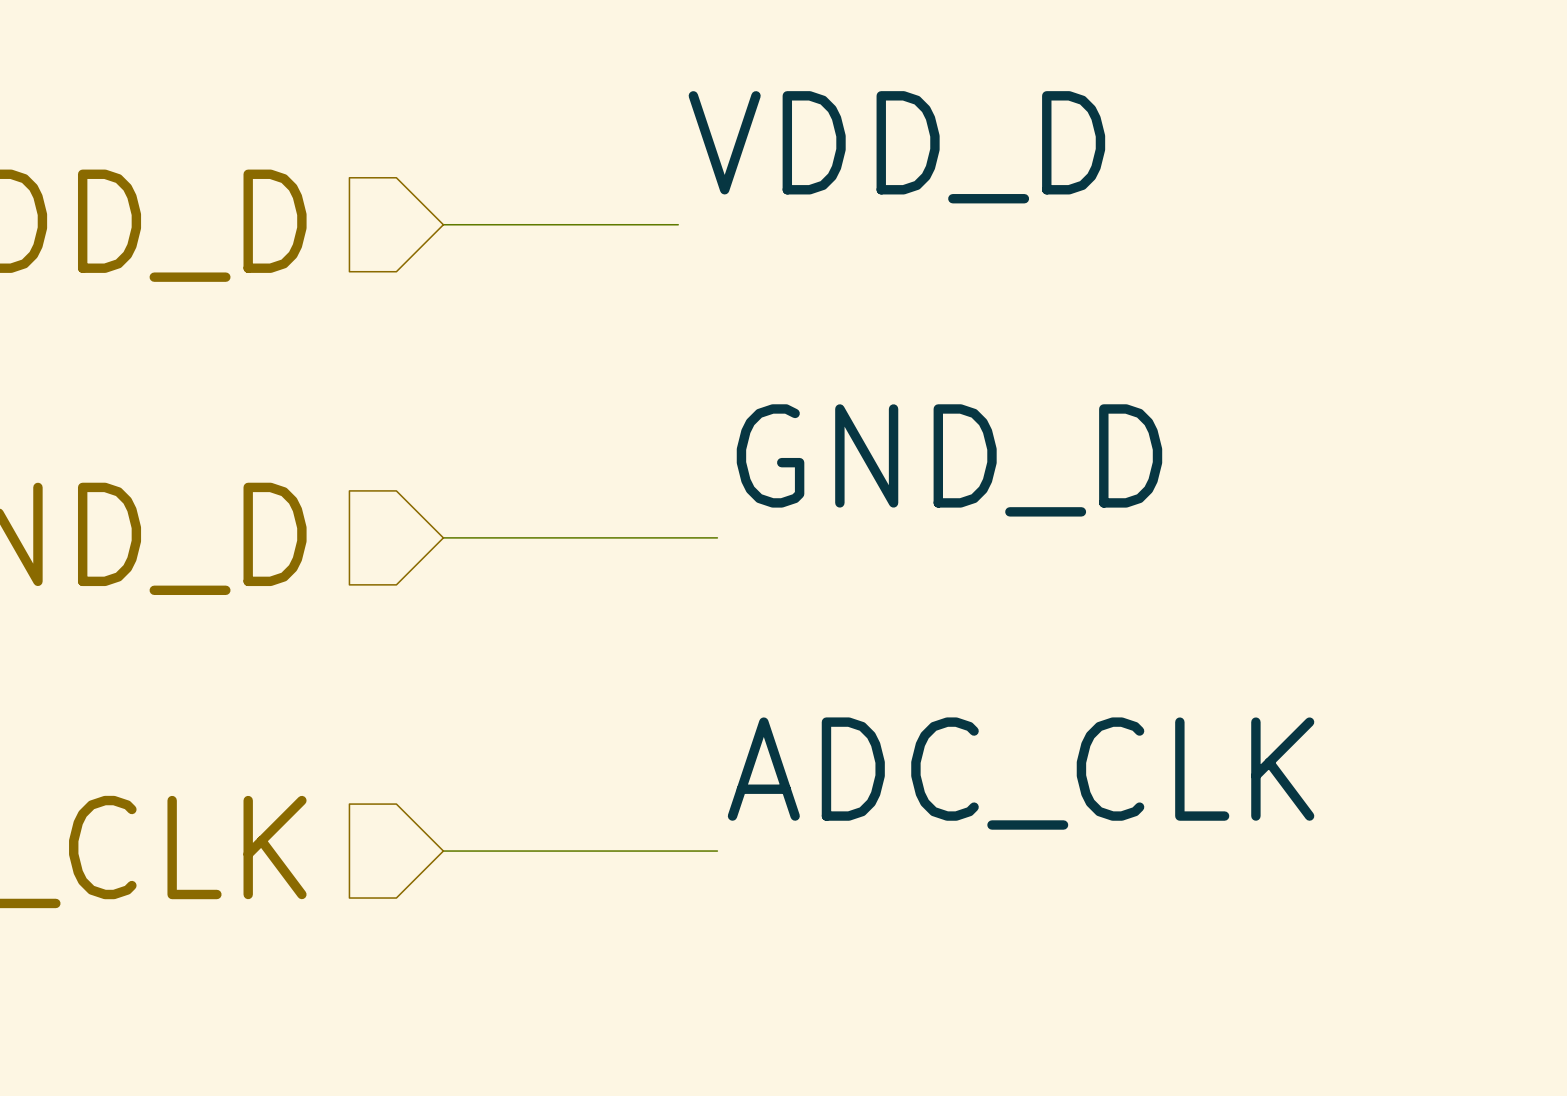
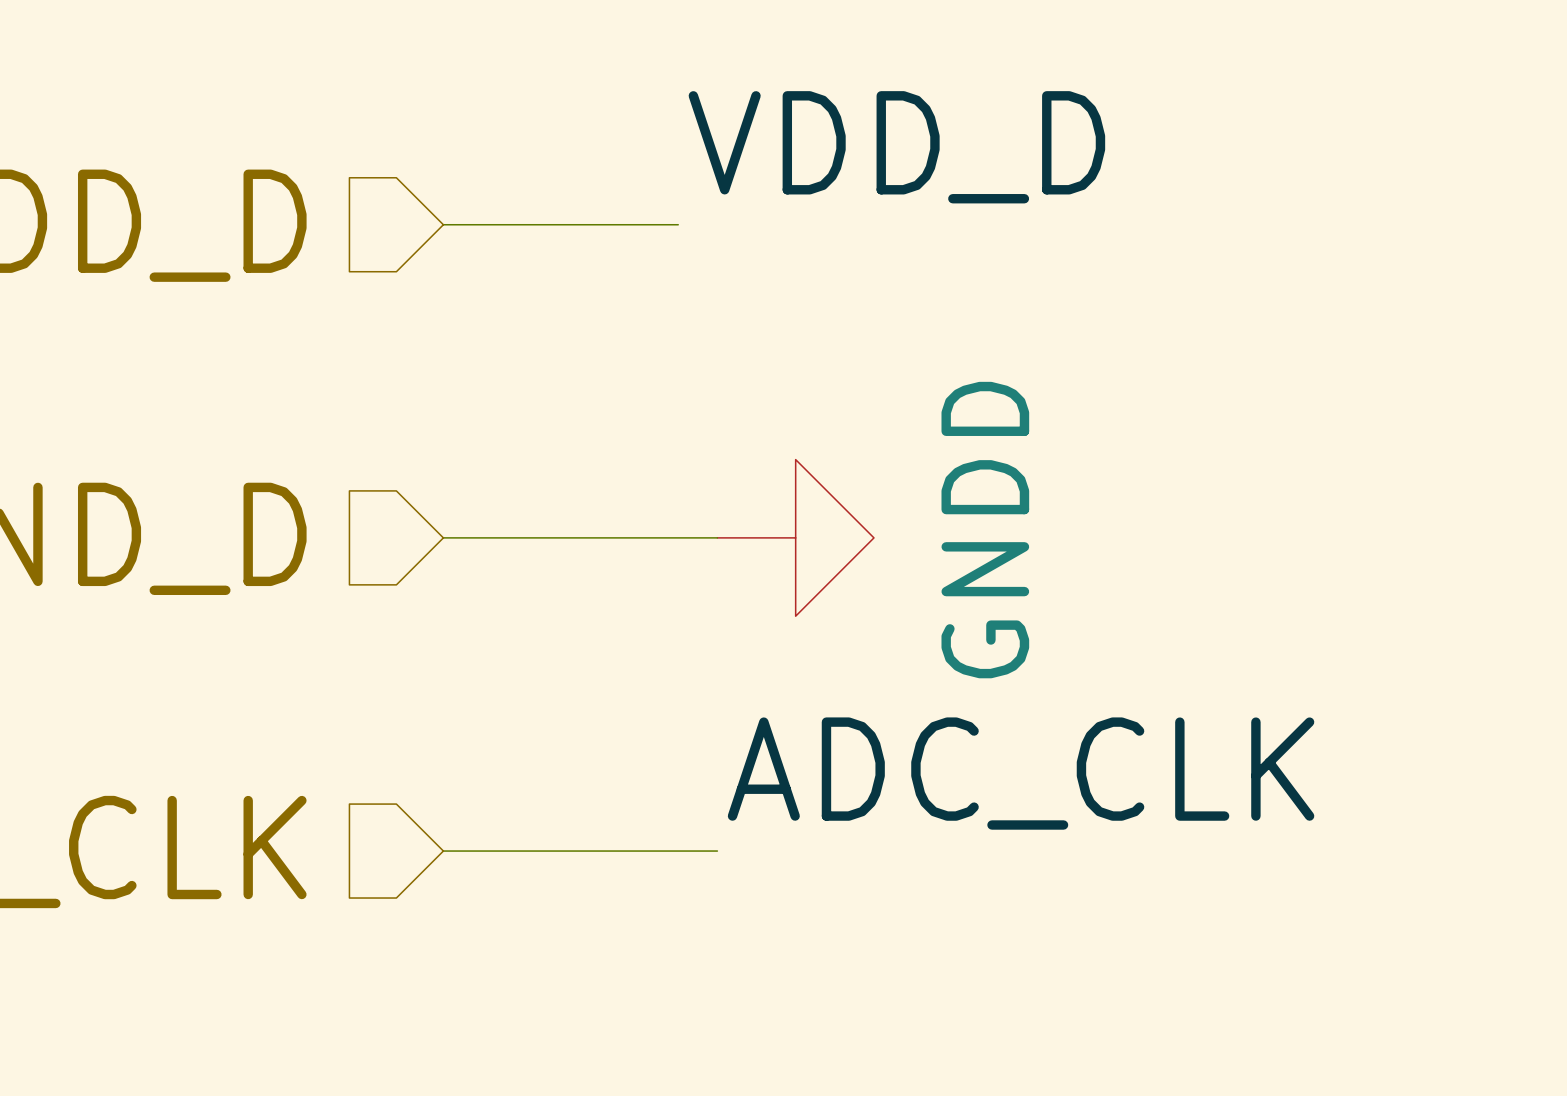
label: GND_D (949, 460) -> none
power symbol: none -> GNDD (795, 537)

